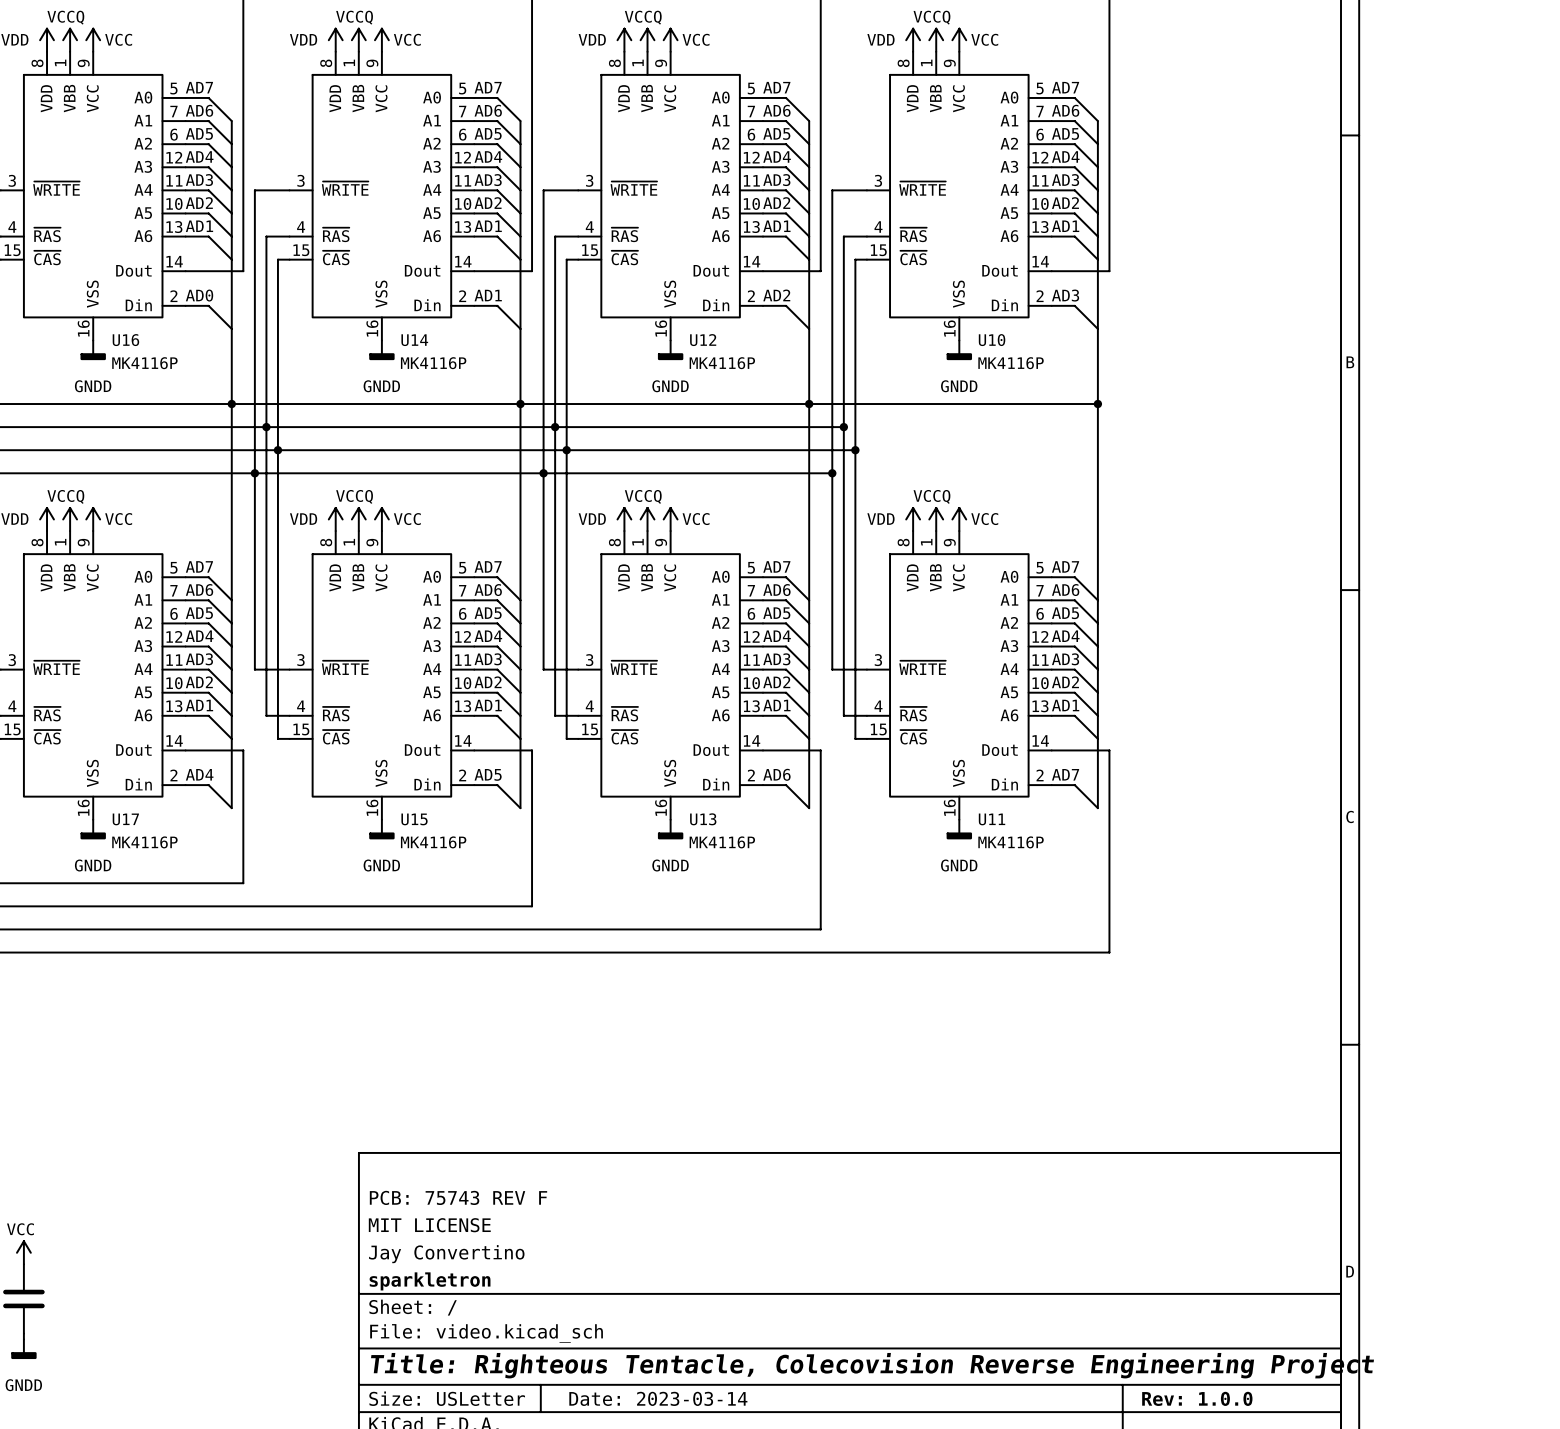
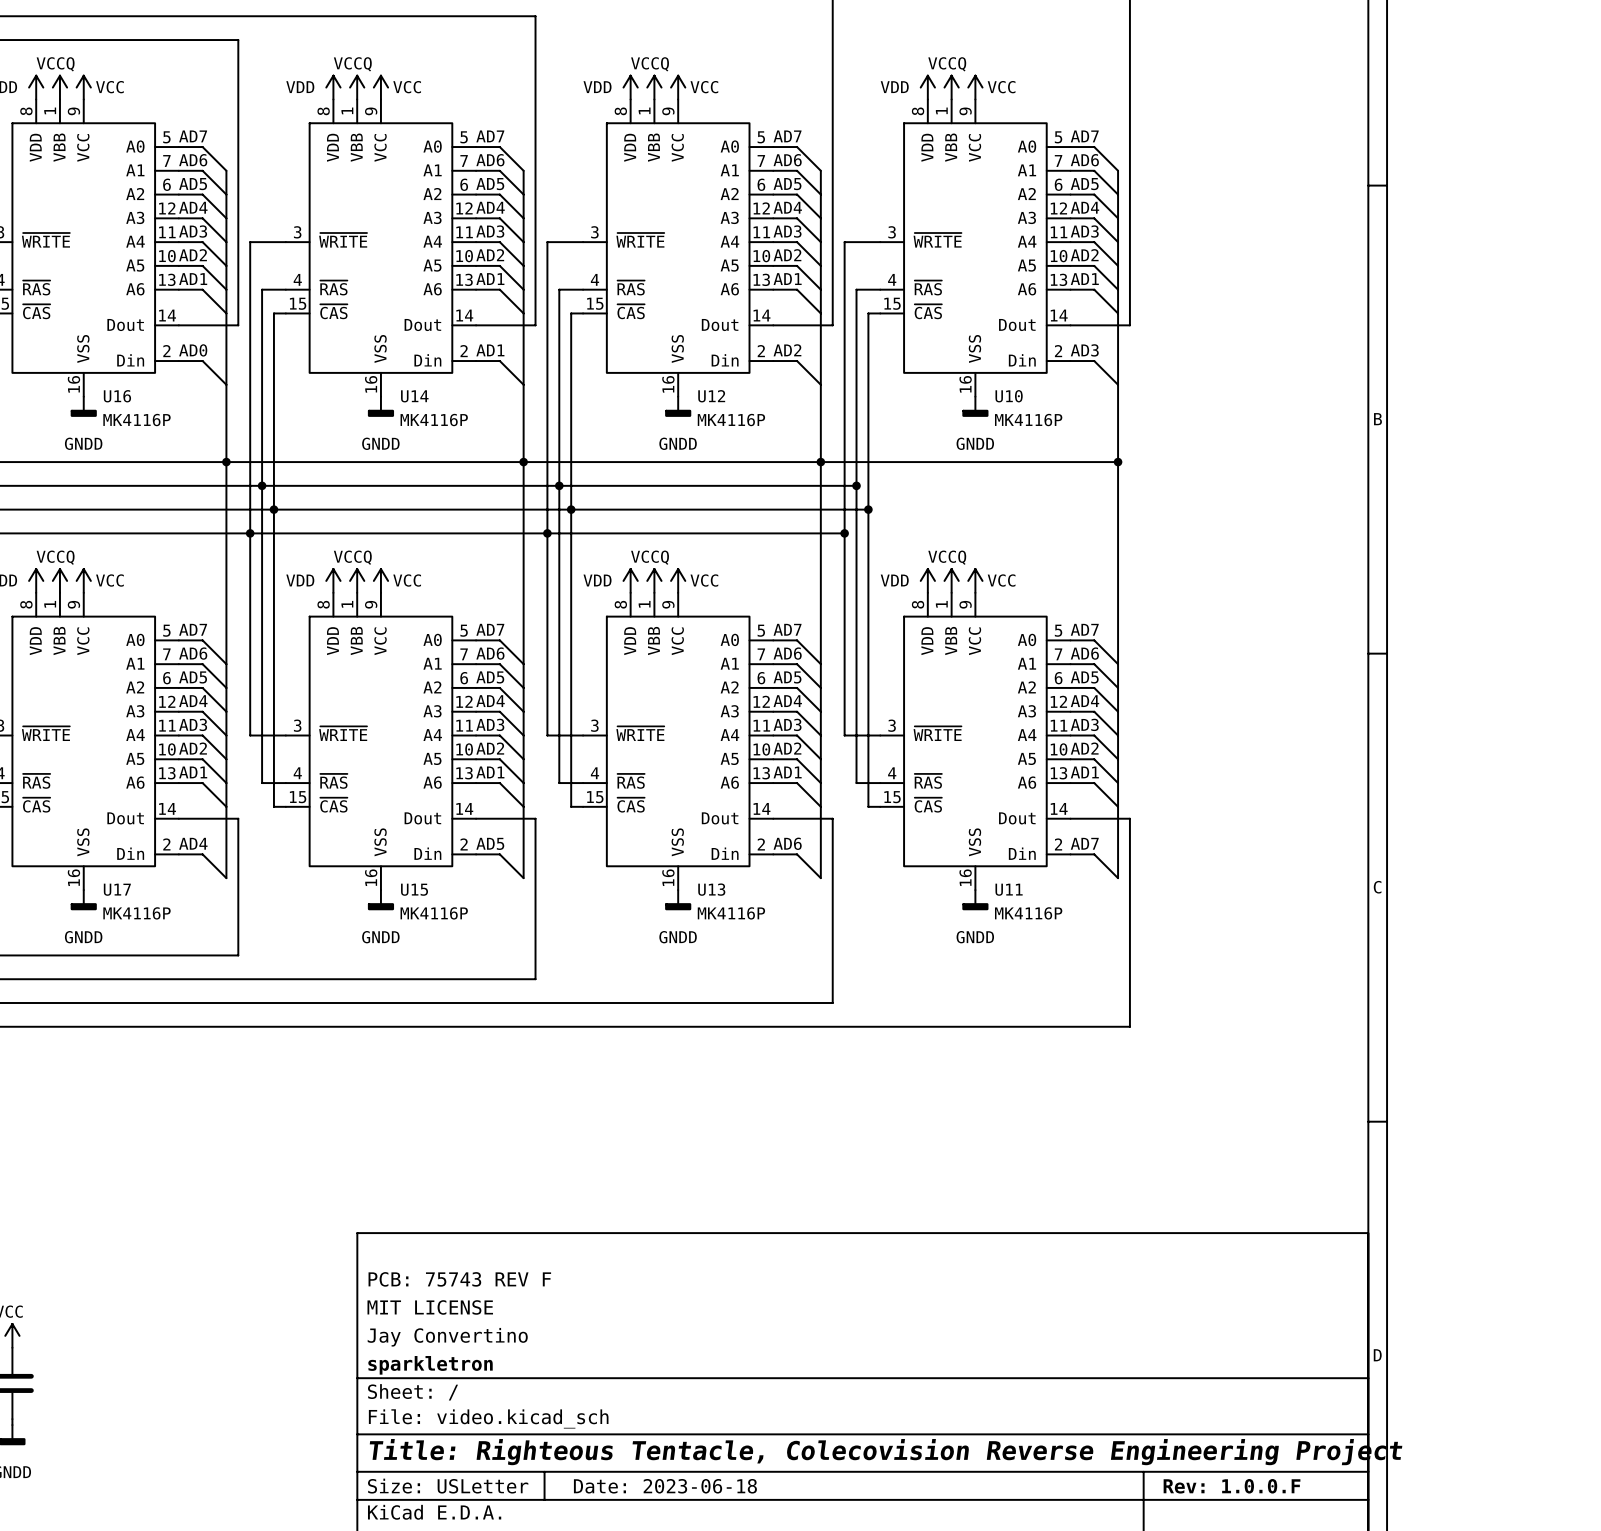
title block: Date: 2023-03-14 (658, 1398) -> Date: 2023-06-18 (665, 1486)
title block: Rev: 1.0.0 (1197, 1398) -> Rev: 1.0.0.F (1232, 1486)

